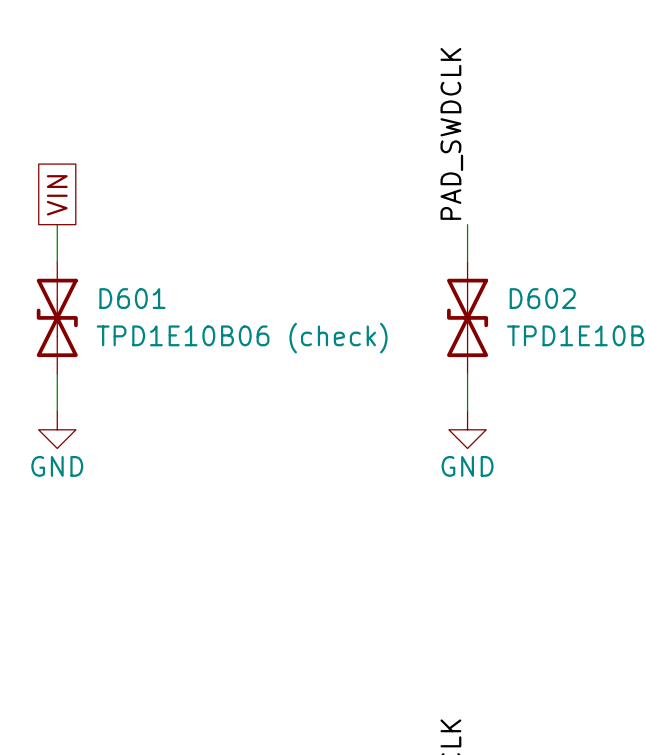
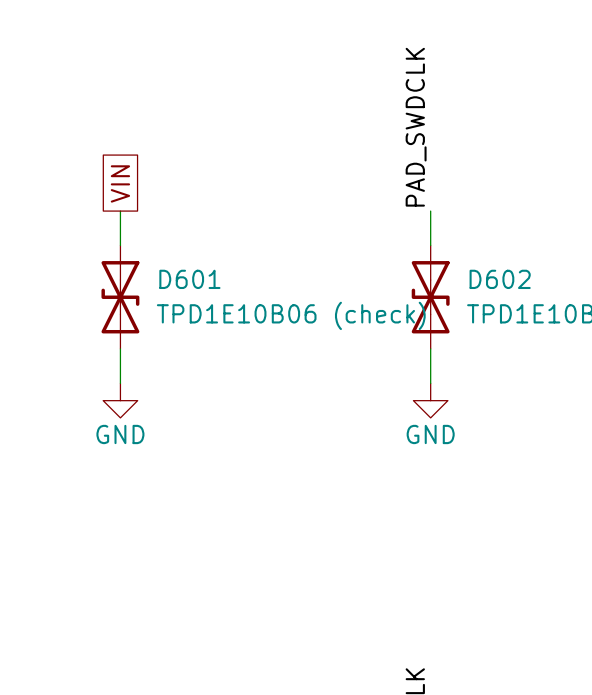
global label position: VIN (57, 195) -> VIN (120, 183)
wire: (57, 224) (57, 261) -> (120, 211) (120, 245)
D601 position: (57, 317) -> (120, 297)
wire: (57, 373) (57, 411) -> (120, 348) (120, 383)
power symbol position: GND (57, 429) -> GND (120, 400)

